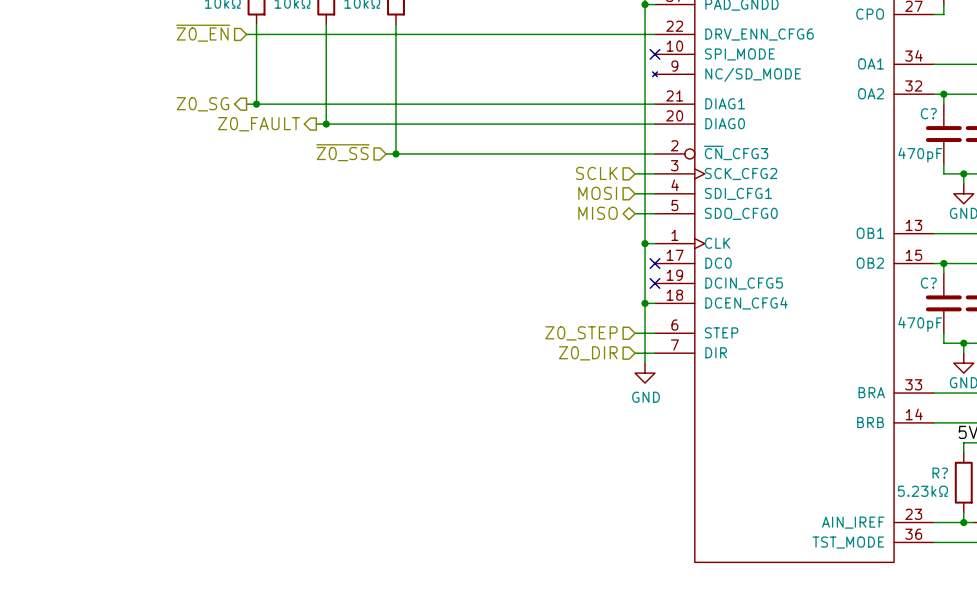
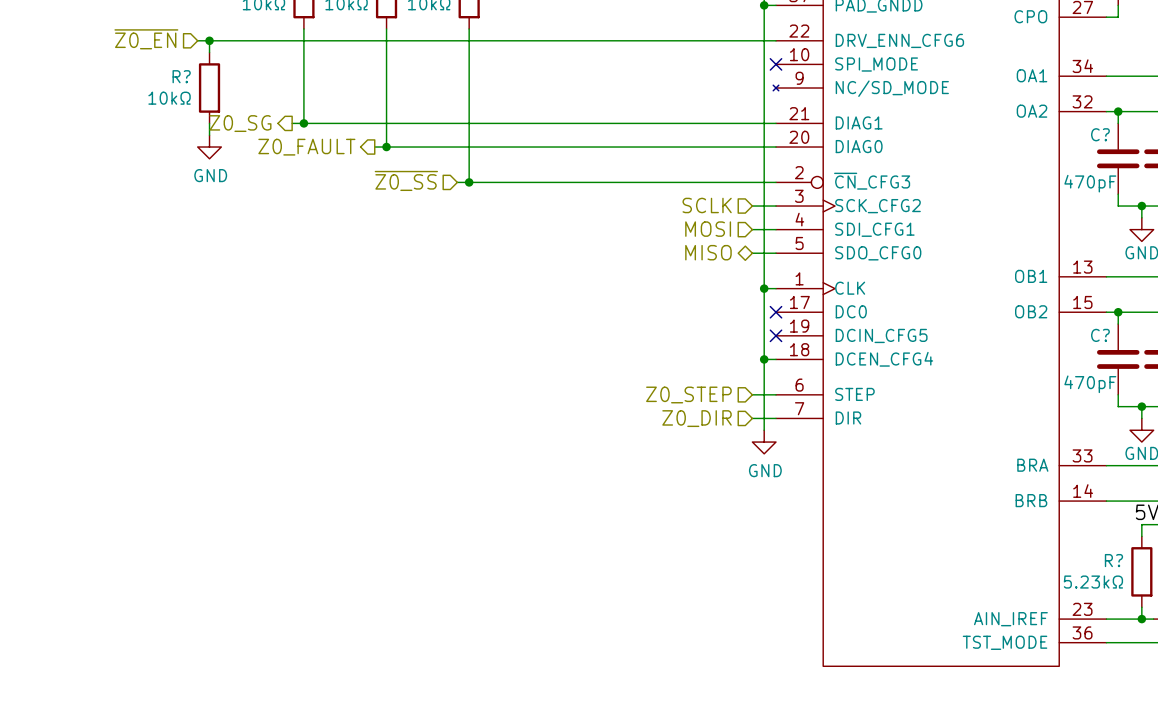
hierarchical label position: ~{Z0_EN} (203, 33) -> ~{Z0_EN} (146, 39)
wire: none -> (197, 40) (292, 40)
wire: none -> (209, 40) (209, 52)
junction: none -> (209, 40)
R?: none -> 10kΩ (209, 88)
wire: none -> (209, 123) (209, 135)
power symbol: none -> GND (209, 147)

